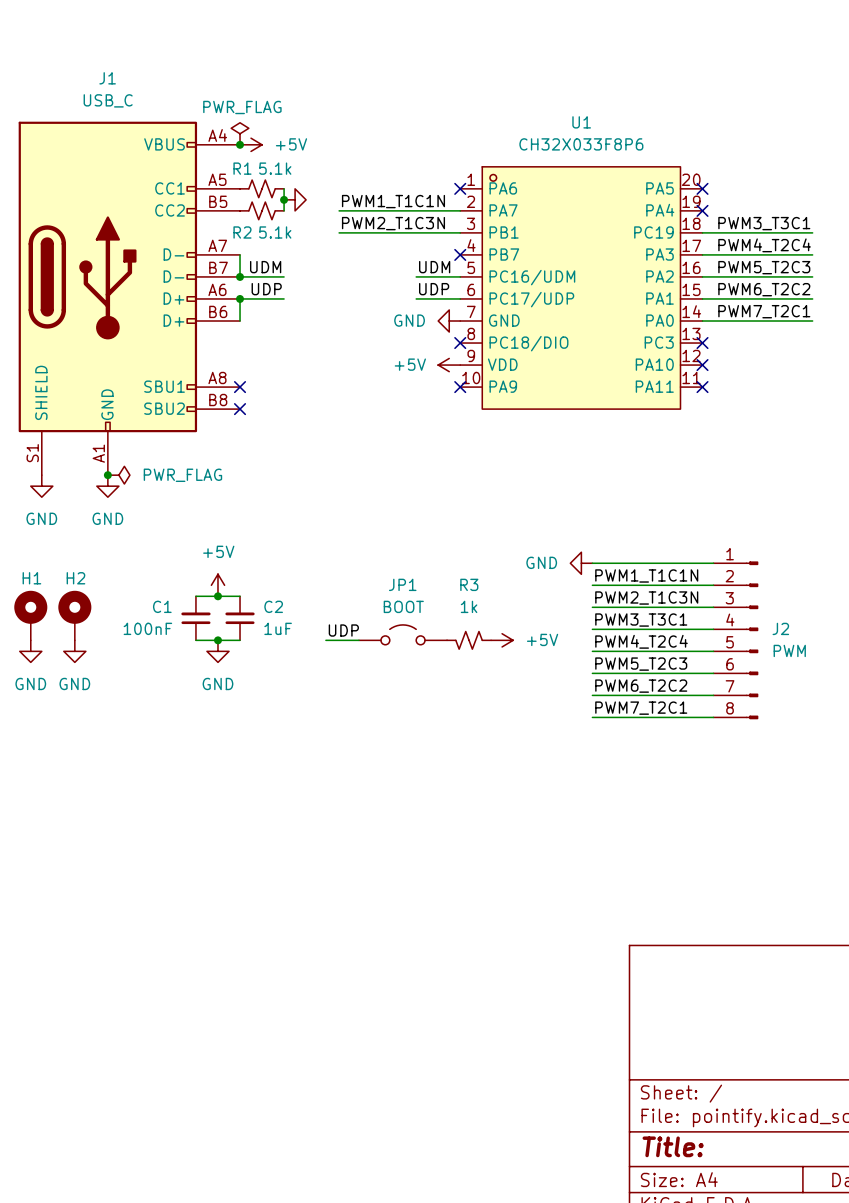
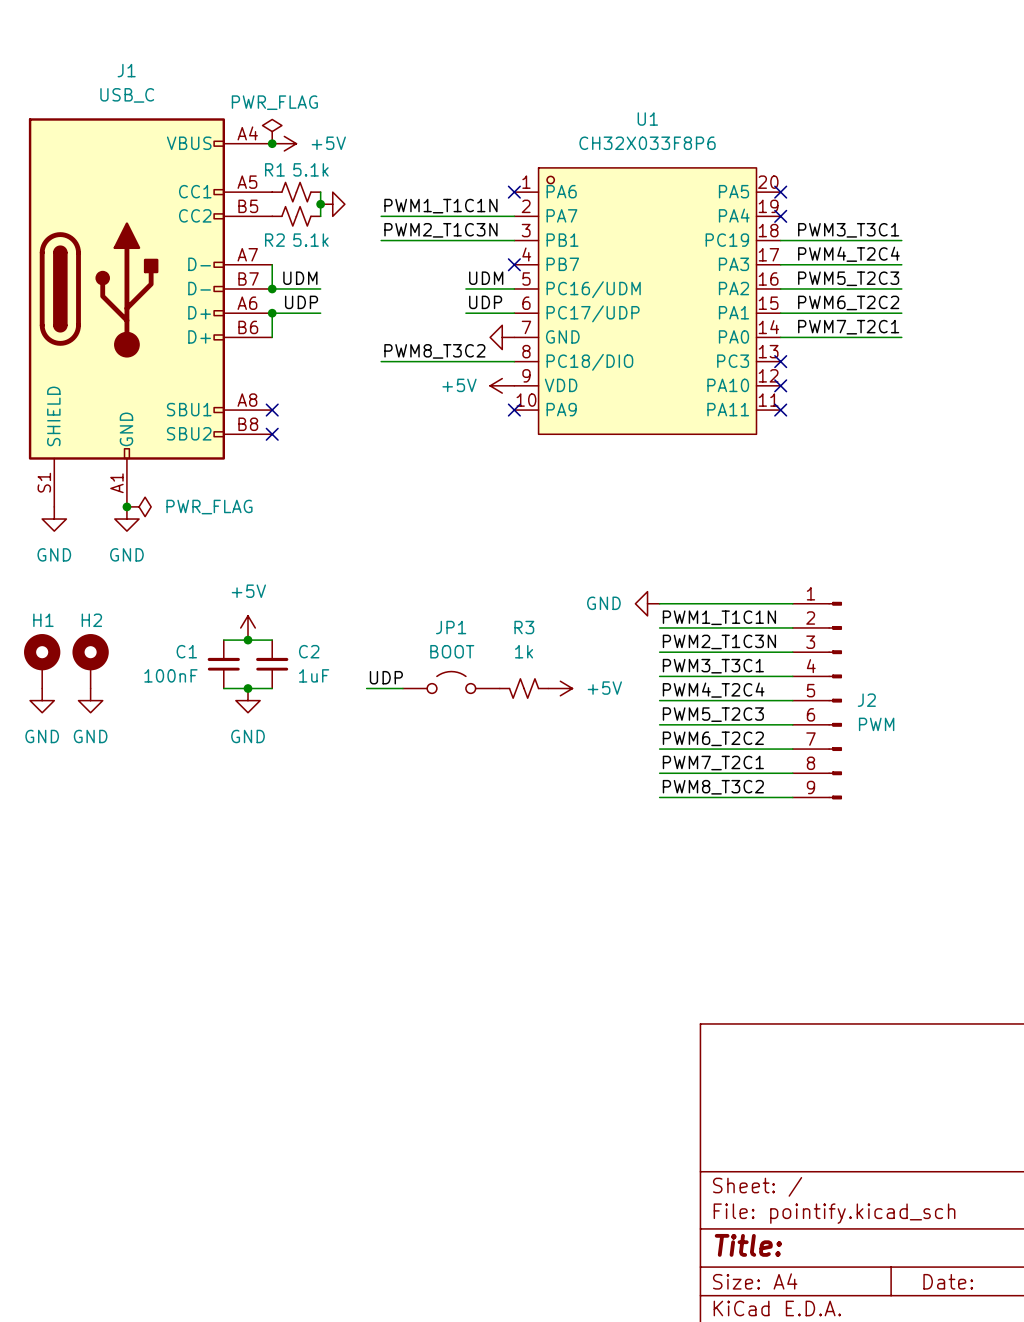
power symbol text: GND (409, 320) -> none
label: none -> PWM8_T3C2 (434, 351)
wire: none -> (381, 361) (514, 361)
no-connect mark: (460, 343) -> none
J2 symbol: [713, 561, 759, 720] -> [792, 601, 842, 800]
label: none -> PWM8_T3C2 (713, 787)
wire: none -> (659, 797) (792, 797)

